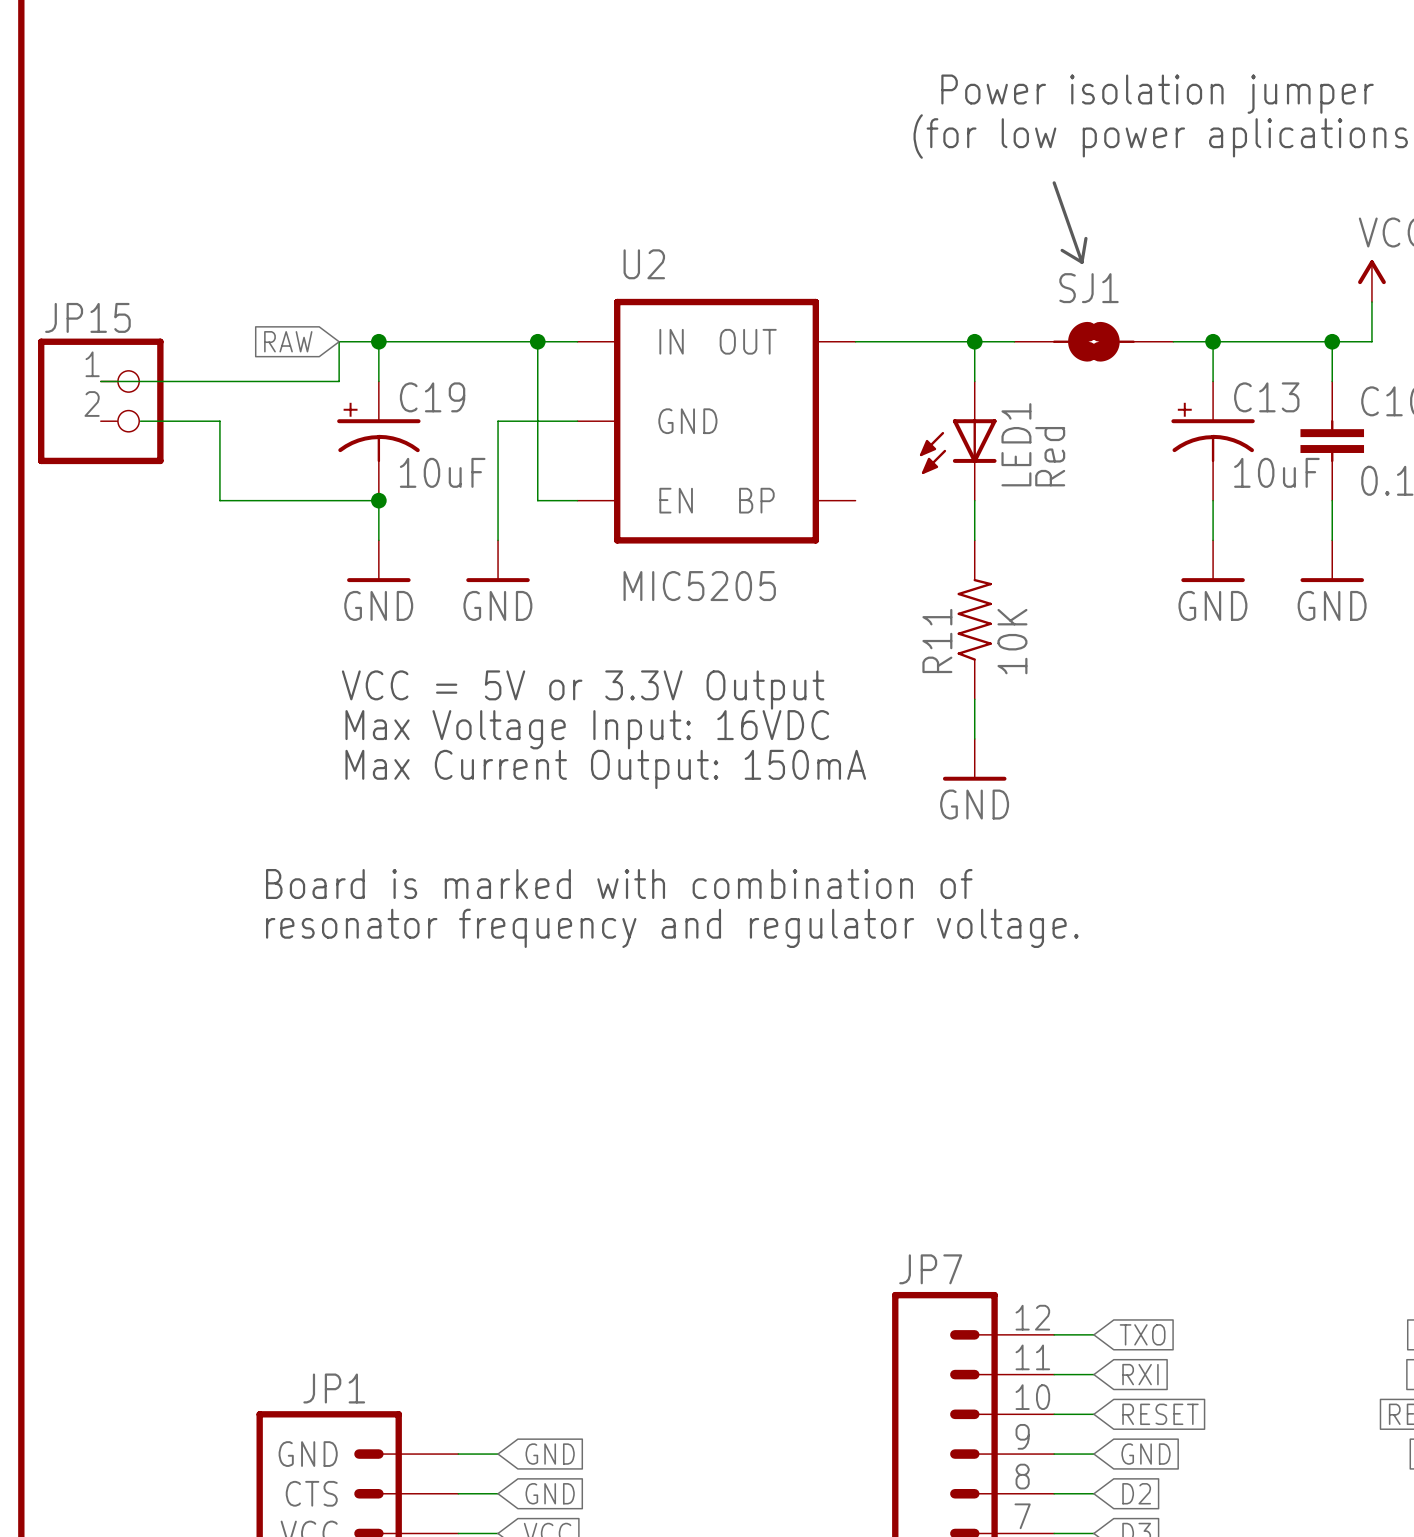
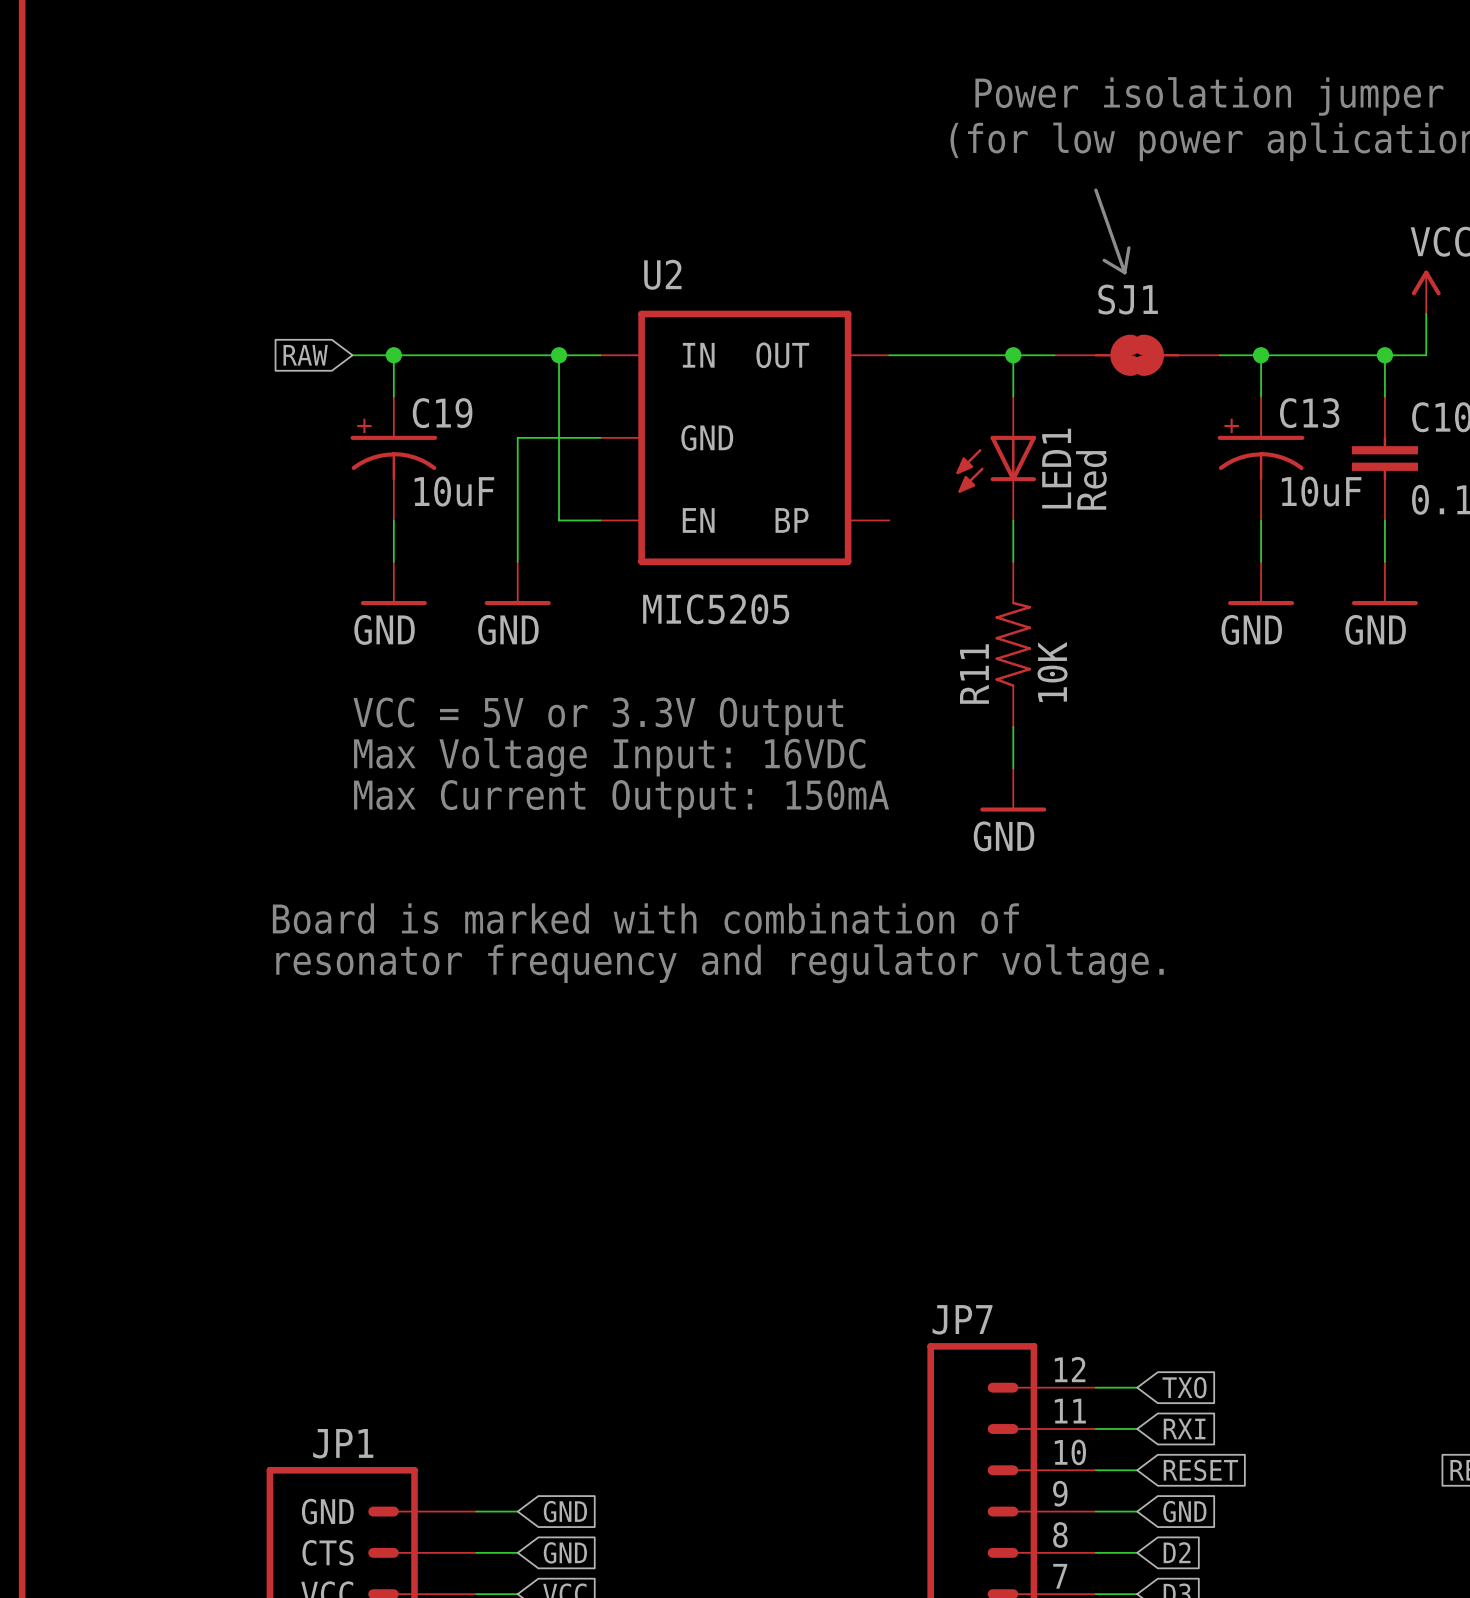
wire: (339, 341) (339, 381) (100, 381) -> none
JP15: (100, 401) -> none
wire: (140, 421) (219, 421) (219, 500) (378, 500) -> none
junction: (378, 500) -> none

